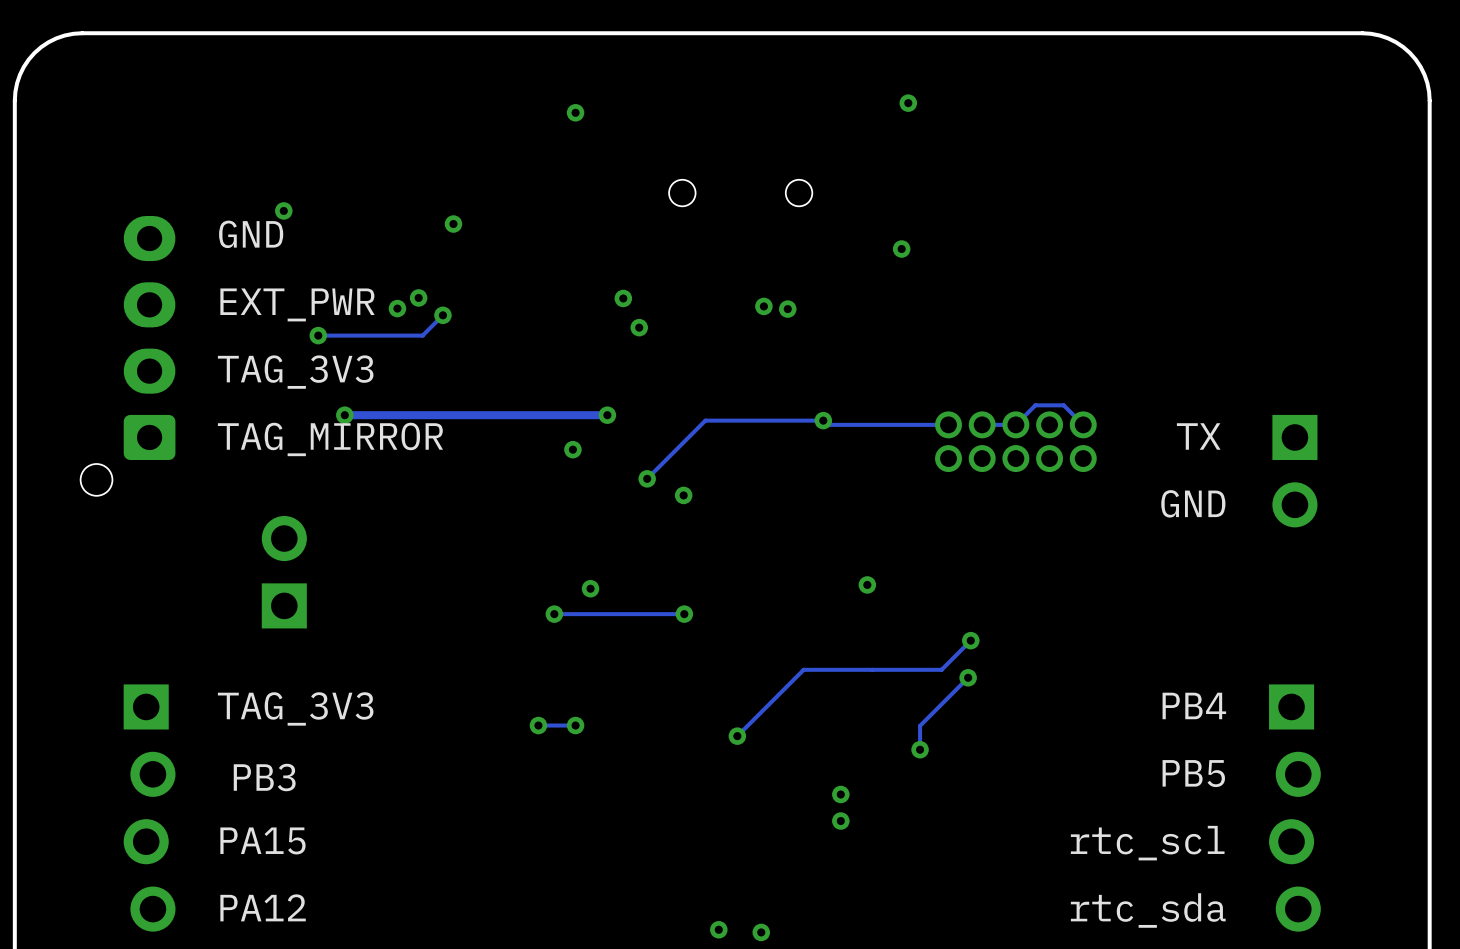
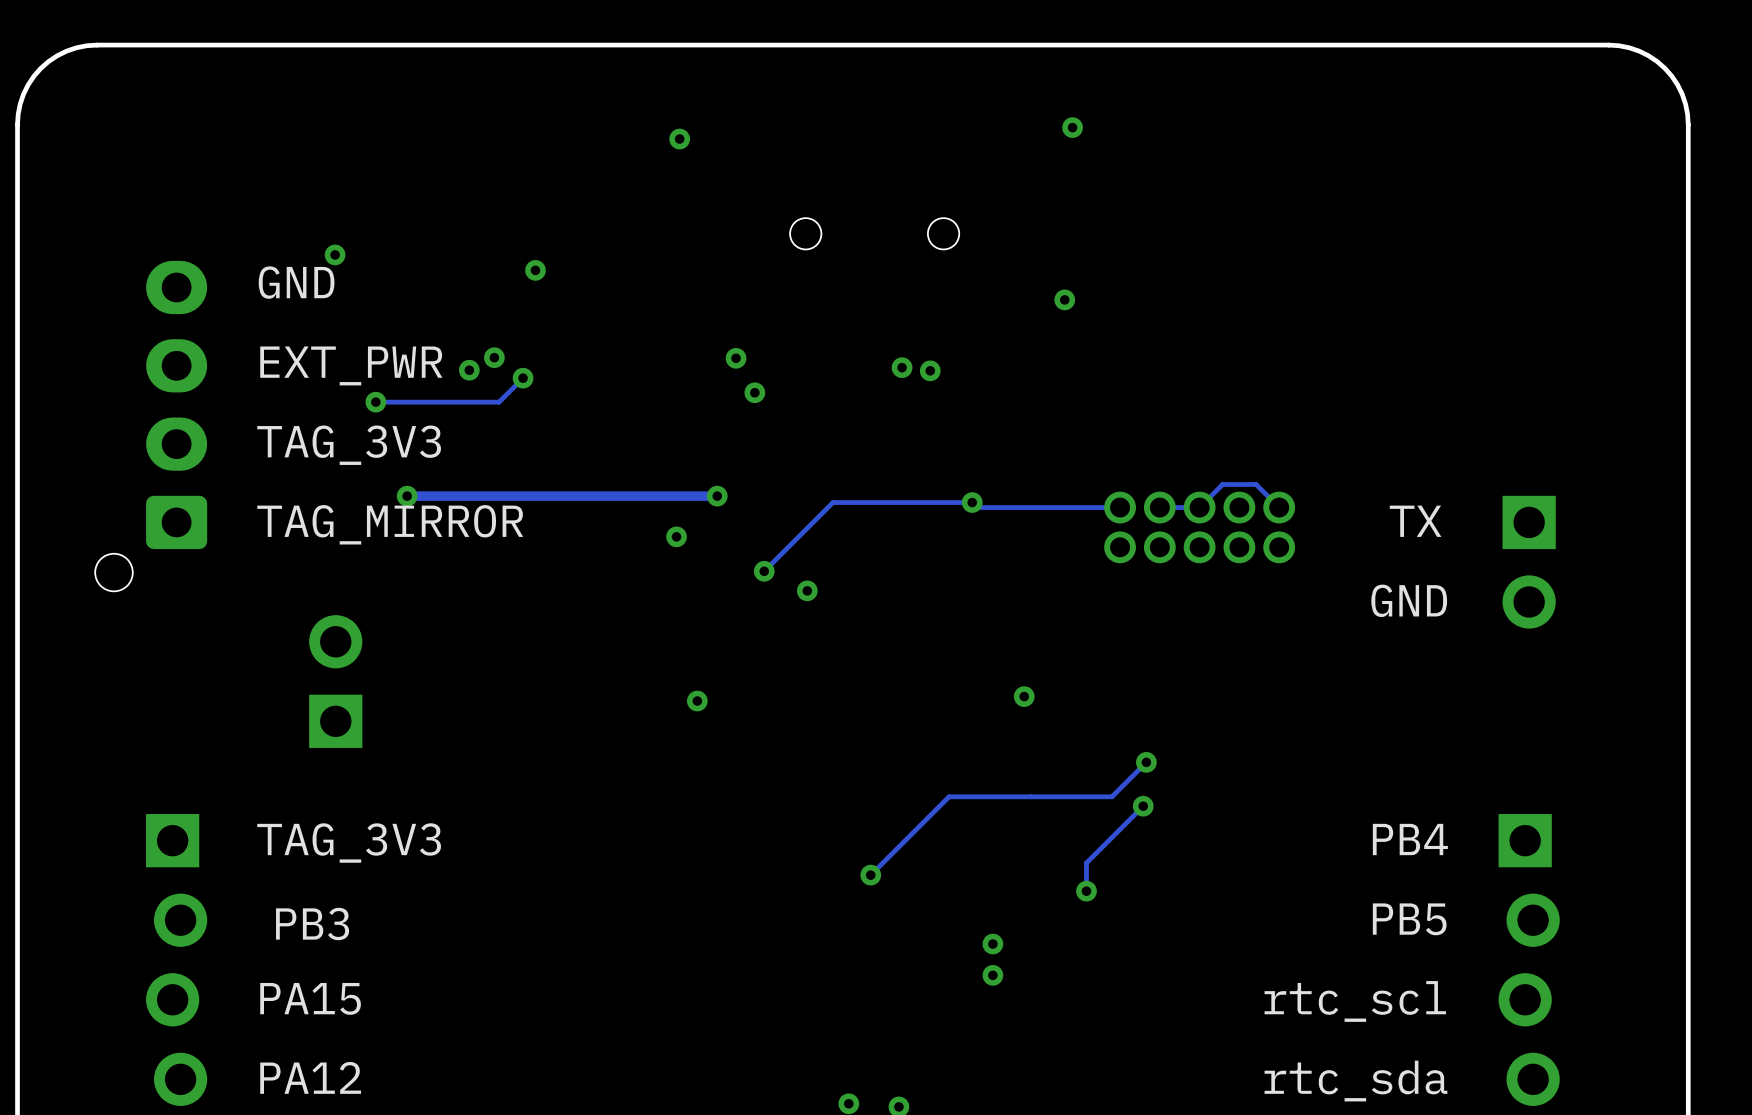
via: (554, 614) -> none
track: (684, 614) (554, 614) -> none
via: (684, 614) -> none
via: (538, 725) -> none
track: (575, 725) (538, 725) -> none
via: (575, 725) -> none

